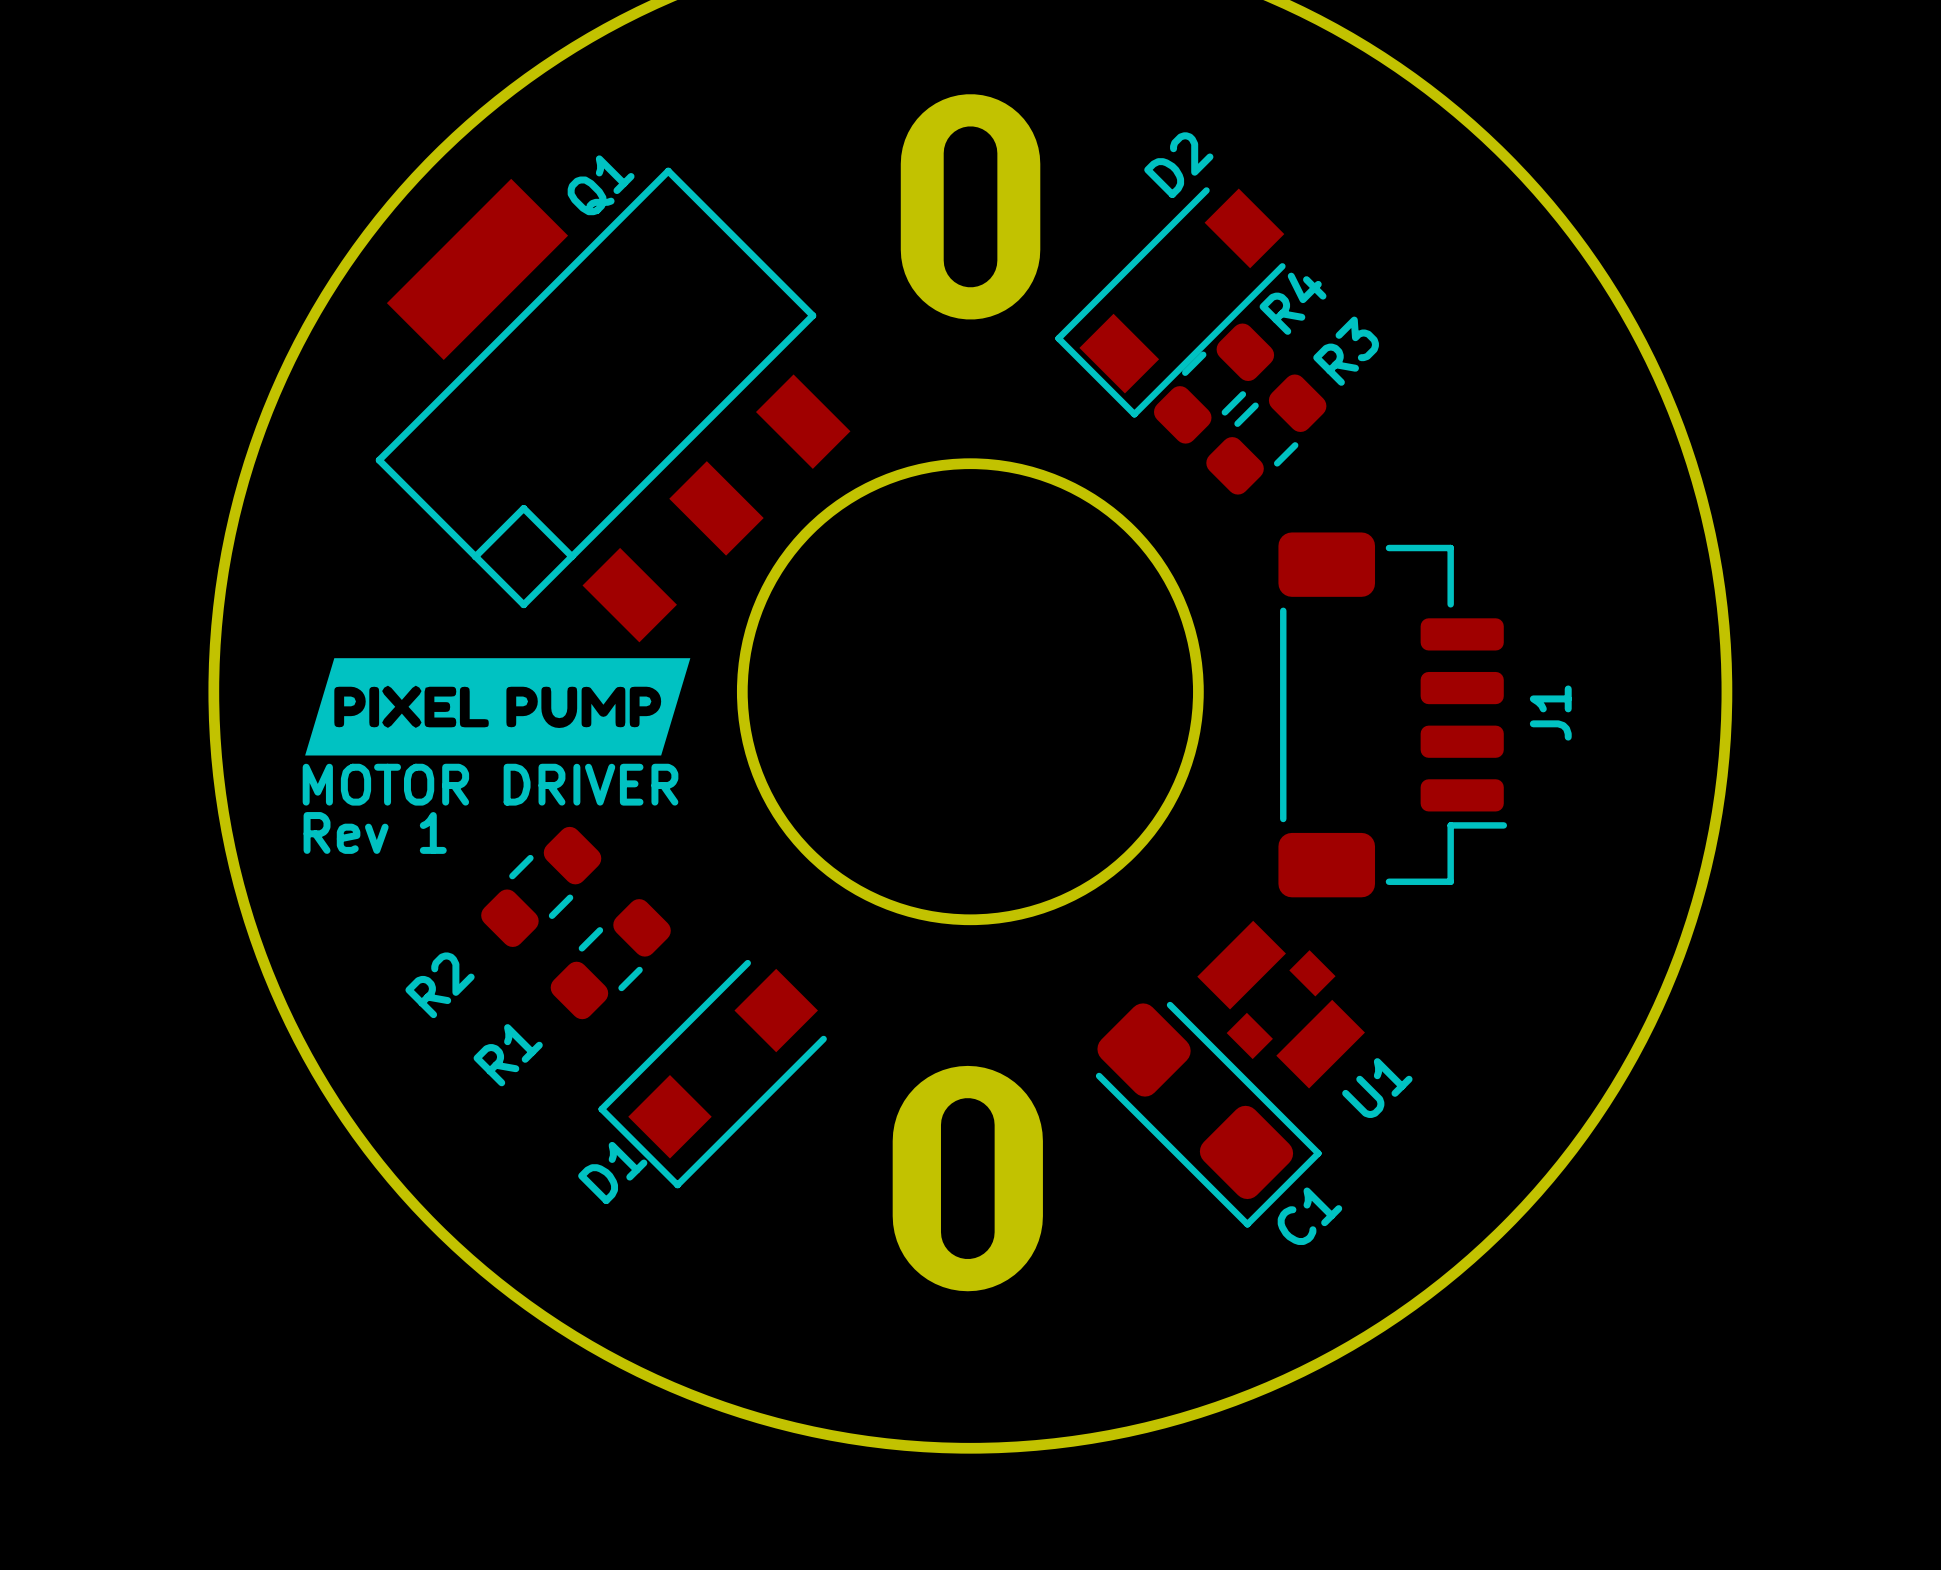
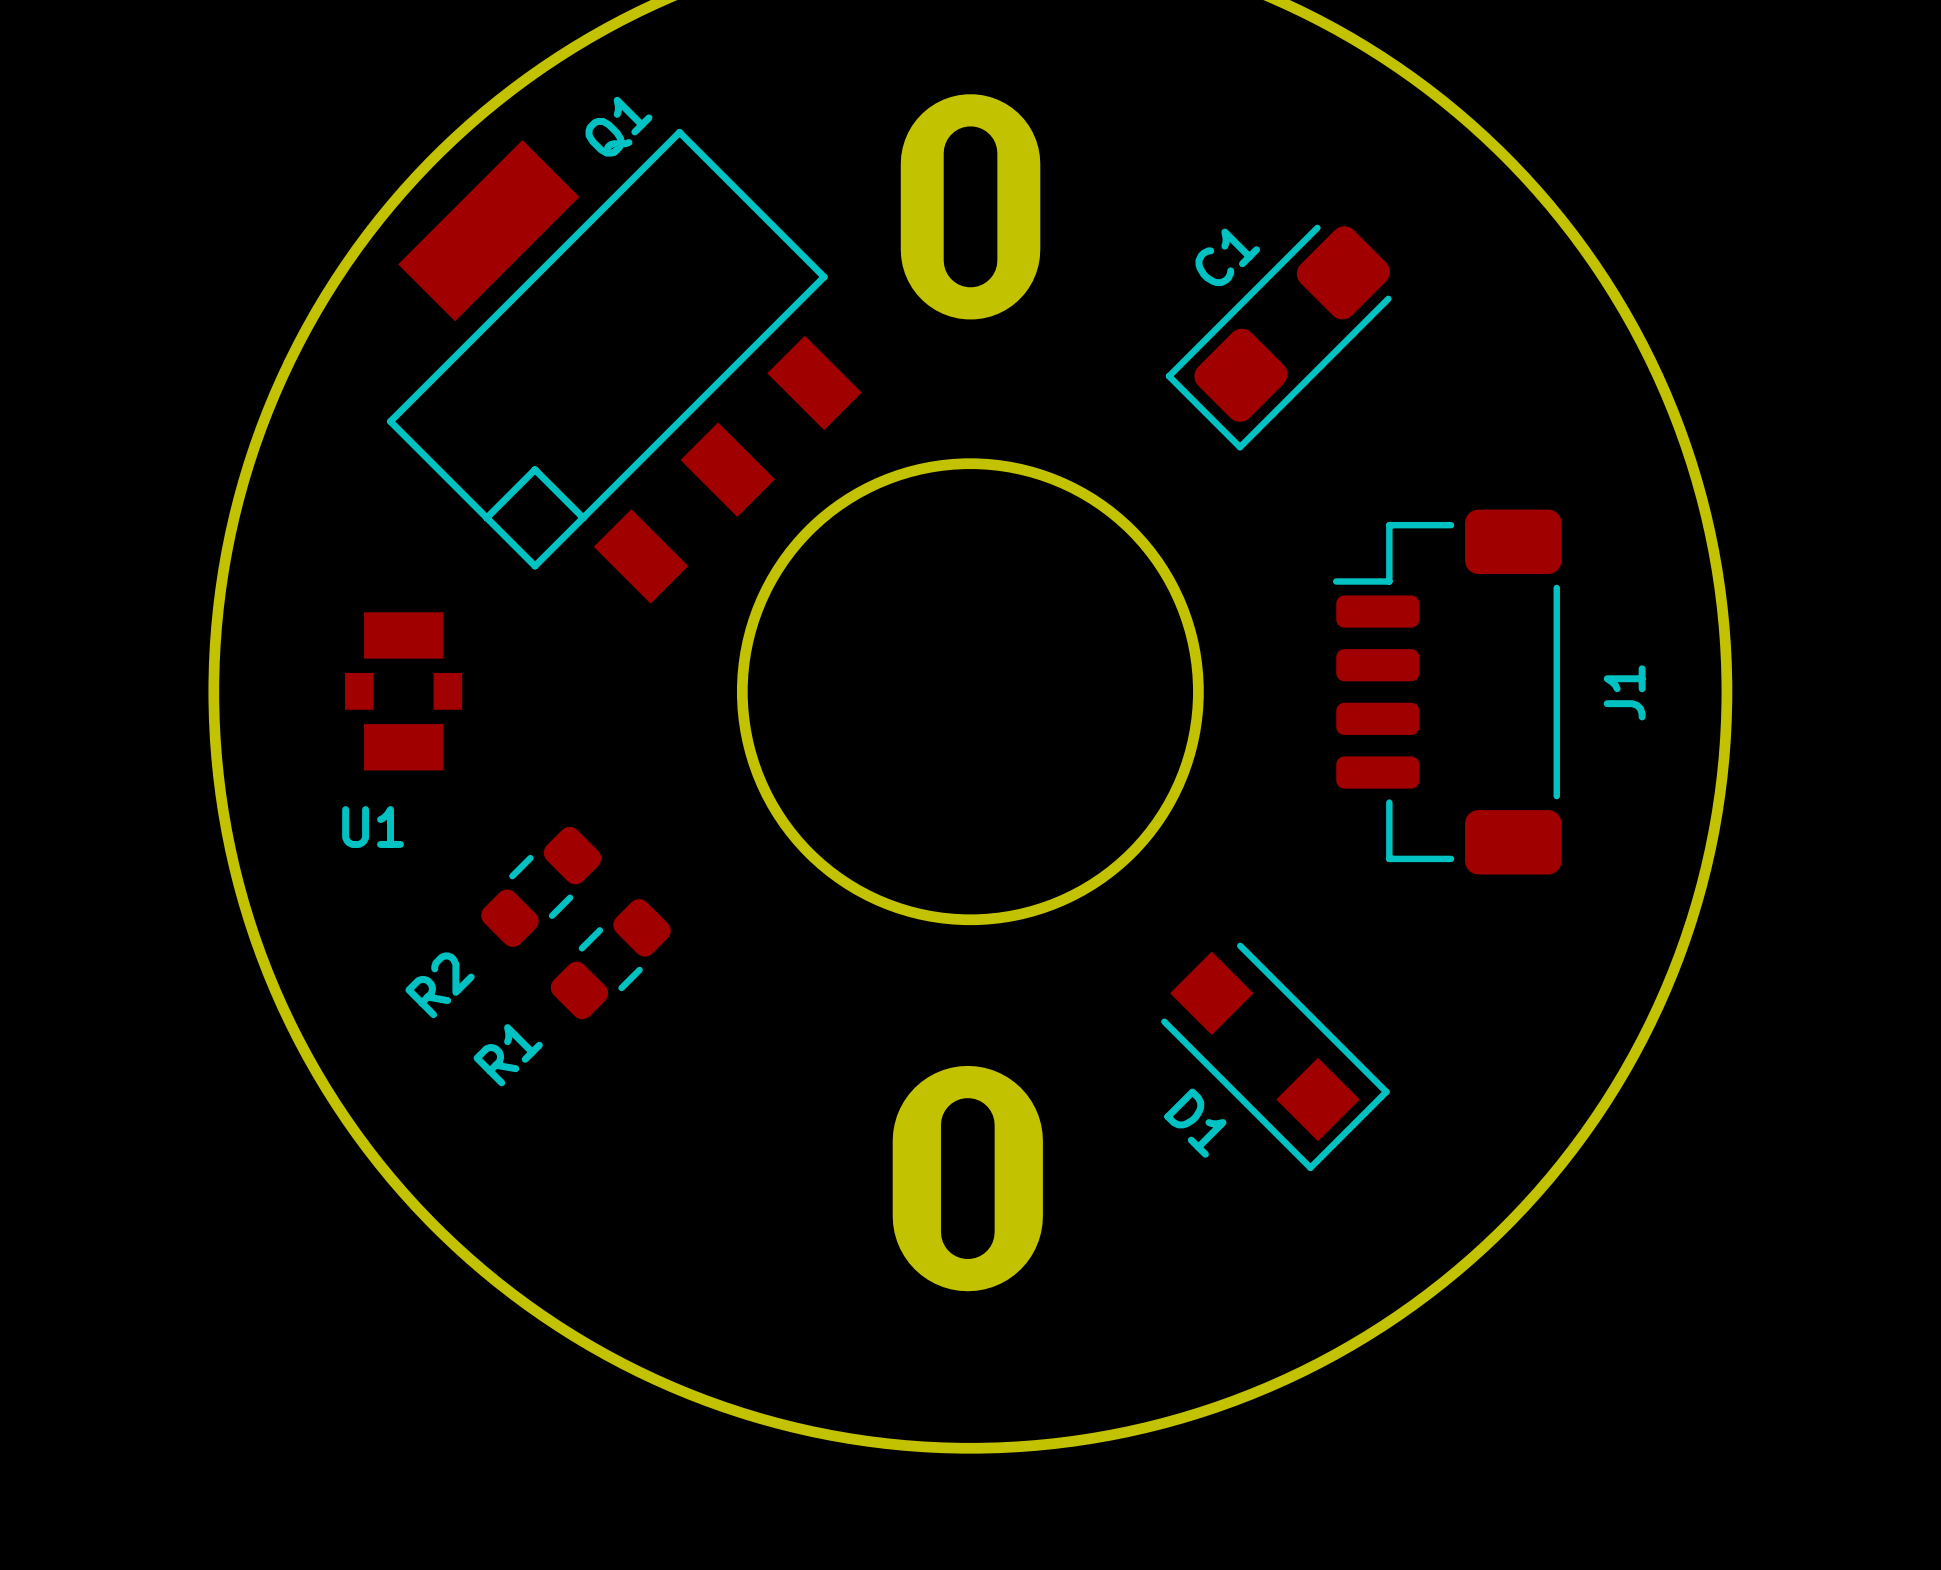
Q1 name position: Q1 (601, 185) -> Q1 (618, 126)
D2: (1170, 302) -> none
R4: (1214, 383) -> none
Q1 position: (613, 405) -> (624, 366)
R3: (1266, 434) -> none
drawing: [305, 658, 691, 756] -> none
J1 rotation: 0° (1392, 714) -> 180° (1447, 692)
text: MOTOR DRIVER (490, 784) -> none
text: Rev 1 (375, 832) -> none
U1 rotation: 0° (1281, 1004) -> 45° clockwise (403, 691)
U1 position: (1281, 1004) -> (403, 691)
D1 rotation: 0° (712, 1074) -> 90° counterclockwise (1275, 1056)
D1 position: (712, 1074) -> (1275, 1056)
C1 rotation: 0° (1208, 1114) -> 90° clockwise (1278, 337)
C1 position: (1208, 1114) -> (1278, 337)
C1 name position: C1 (1309, 1216) -> C1 (1227, 257)

